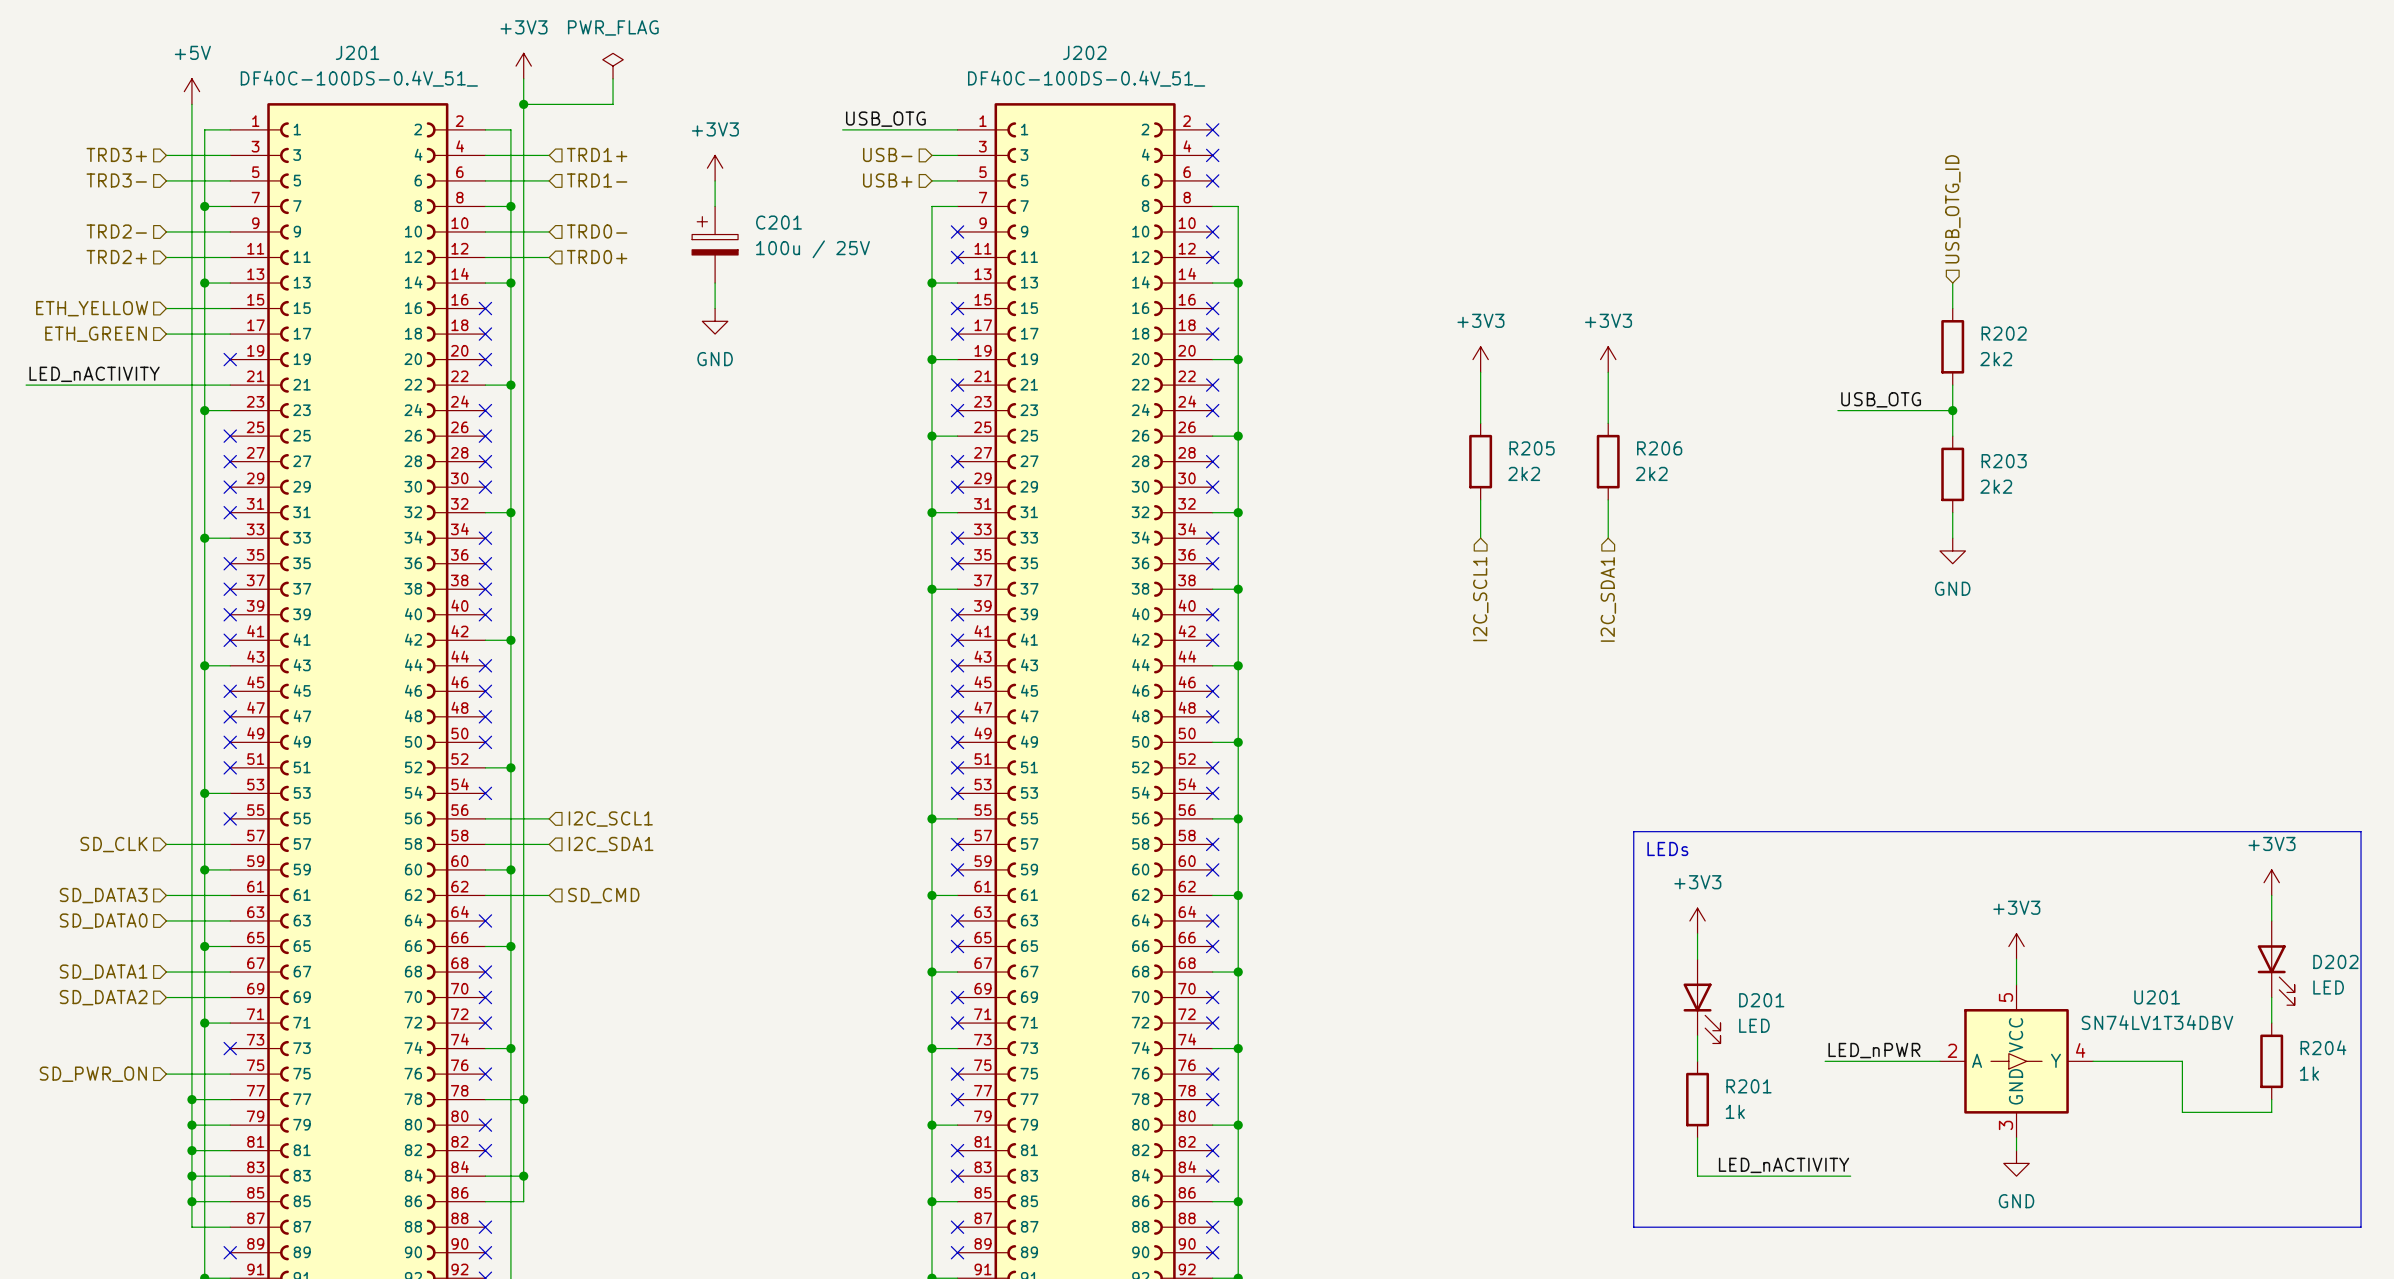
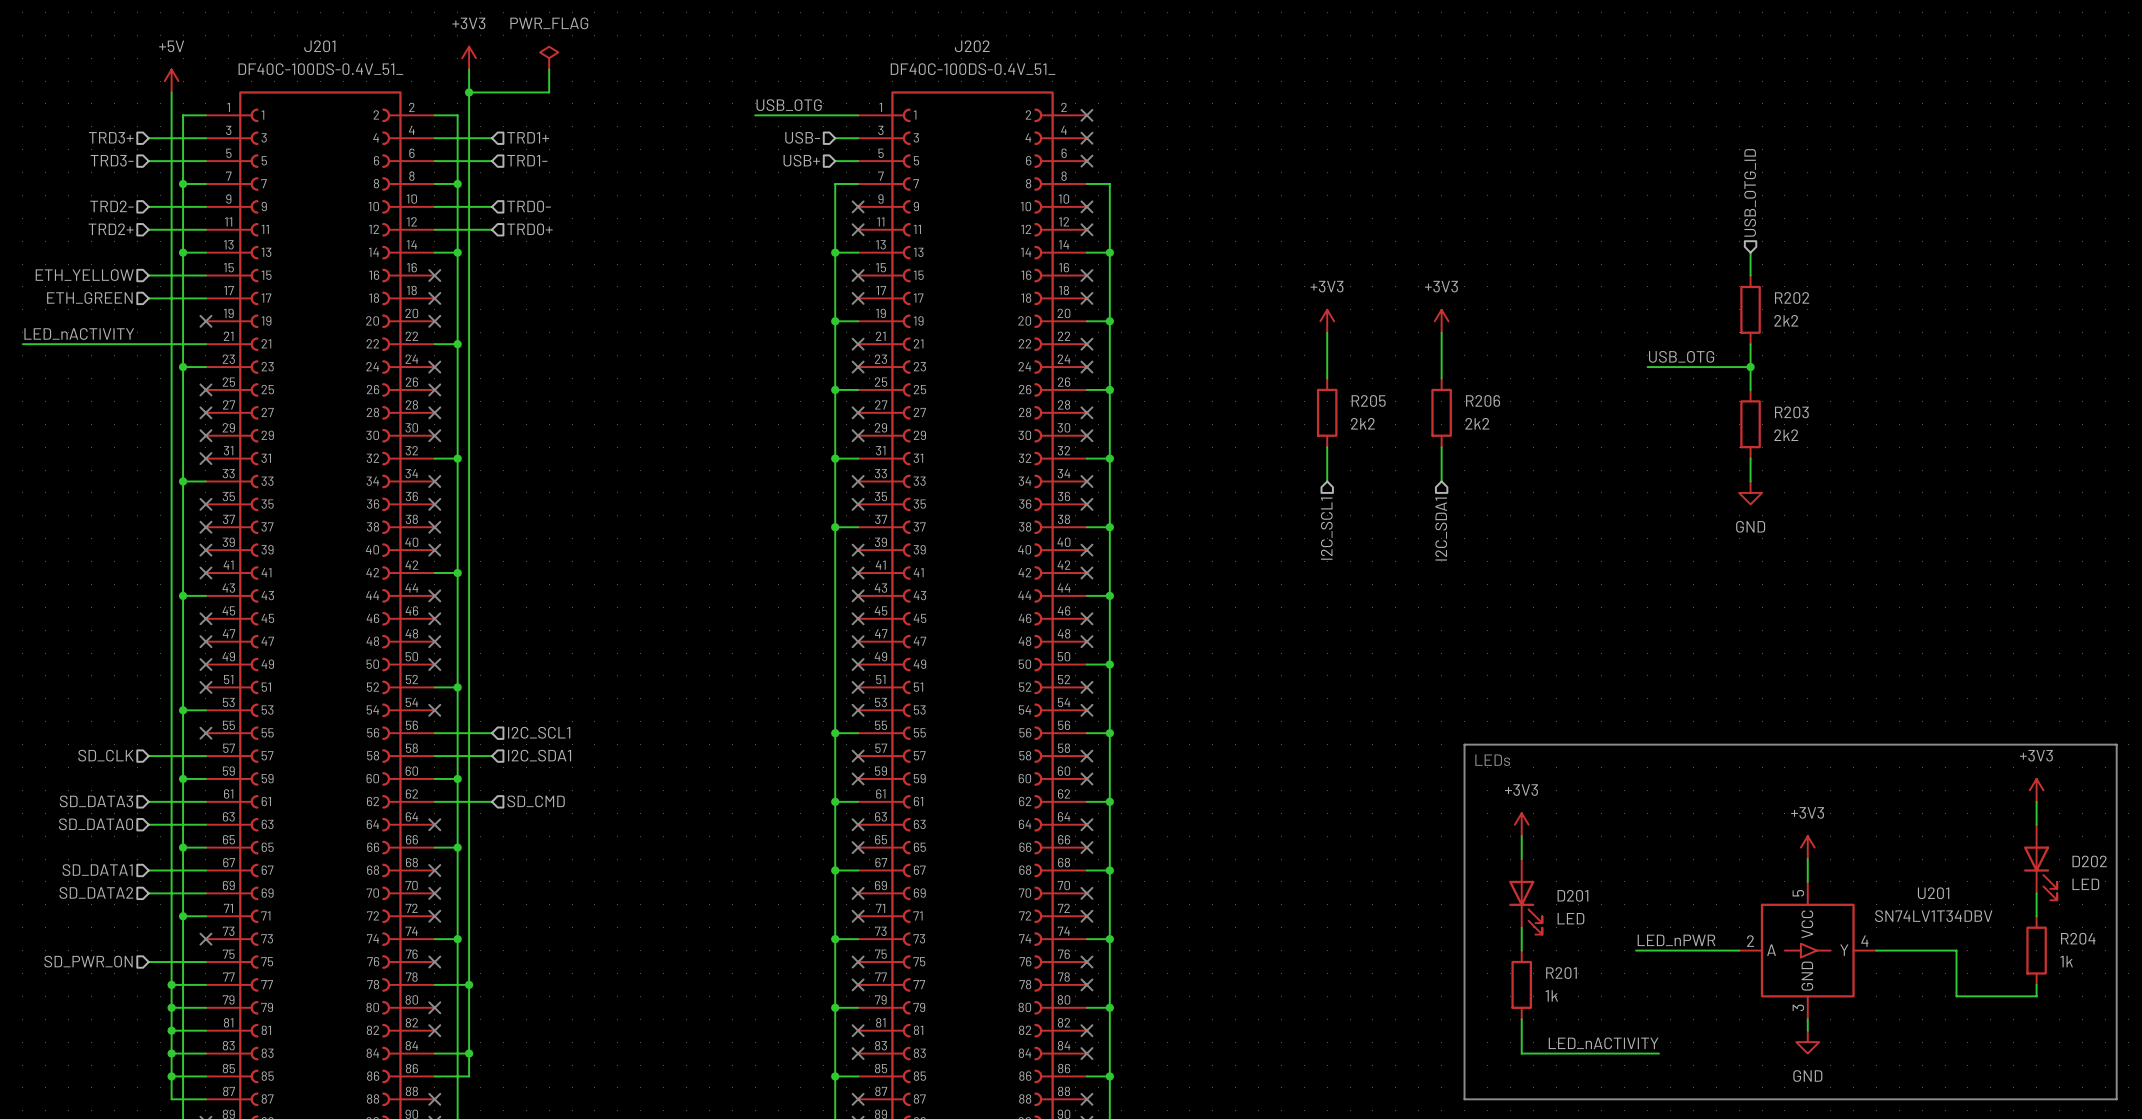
power symbol: +3V3 (715, 168) -> none
wire: (715, 180) (715, 206) -> none
C201: 100u / 25V (715, 244) -> none
wire: (715, 283) (715, 308) -> none
power symbol: GND (715, 321) -> none

